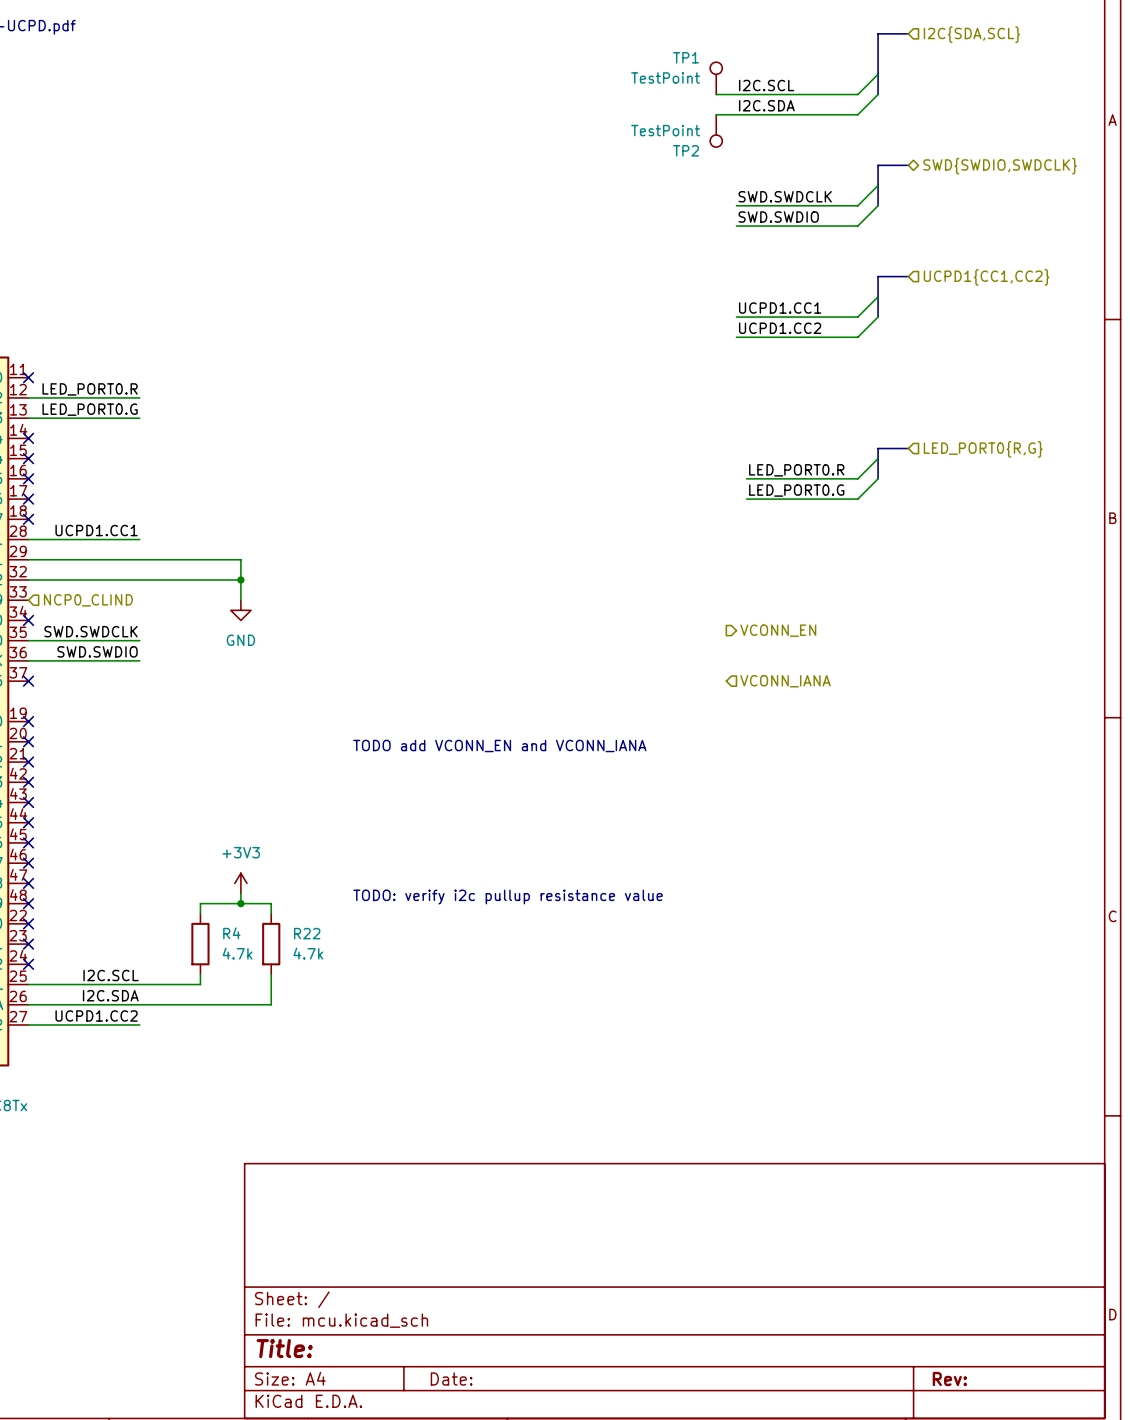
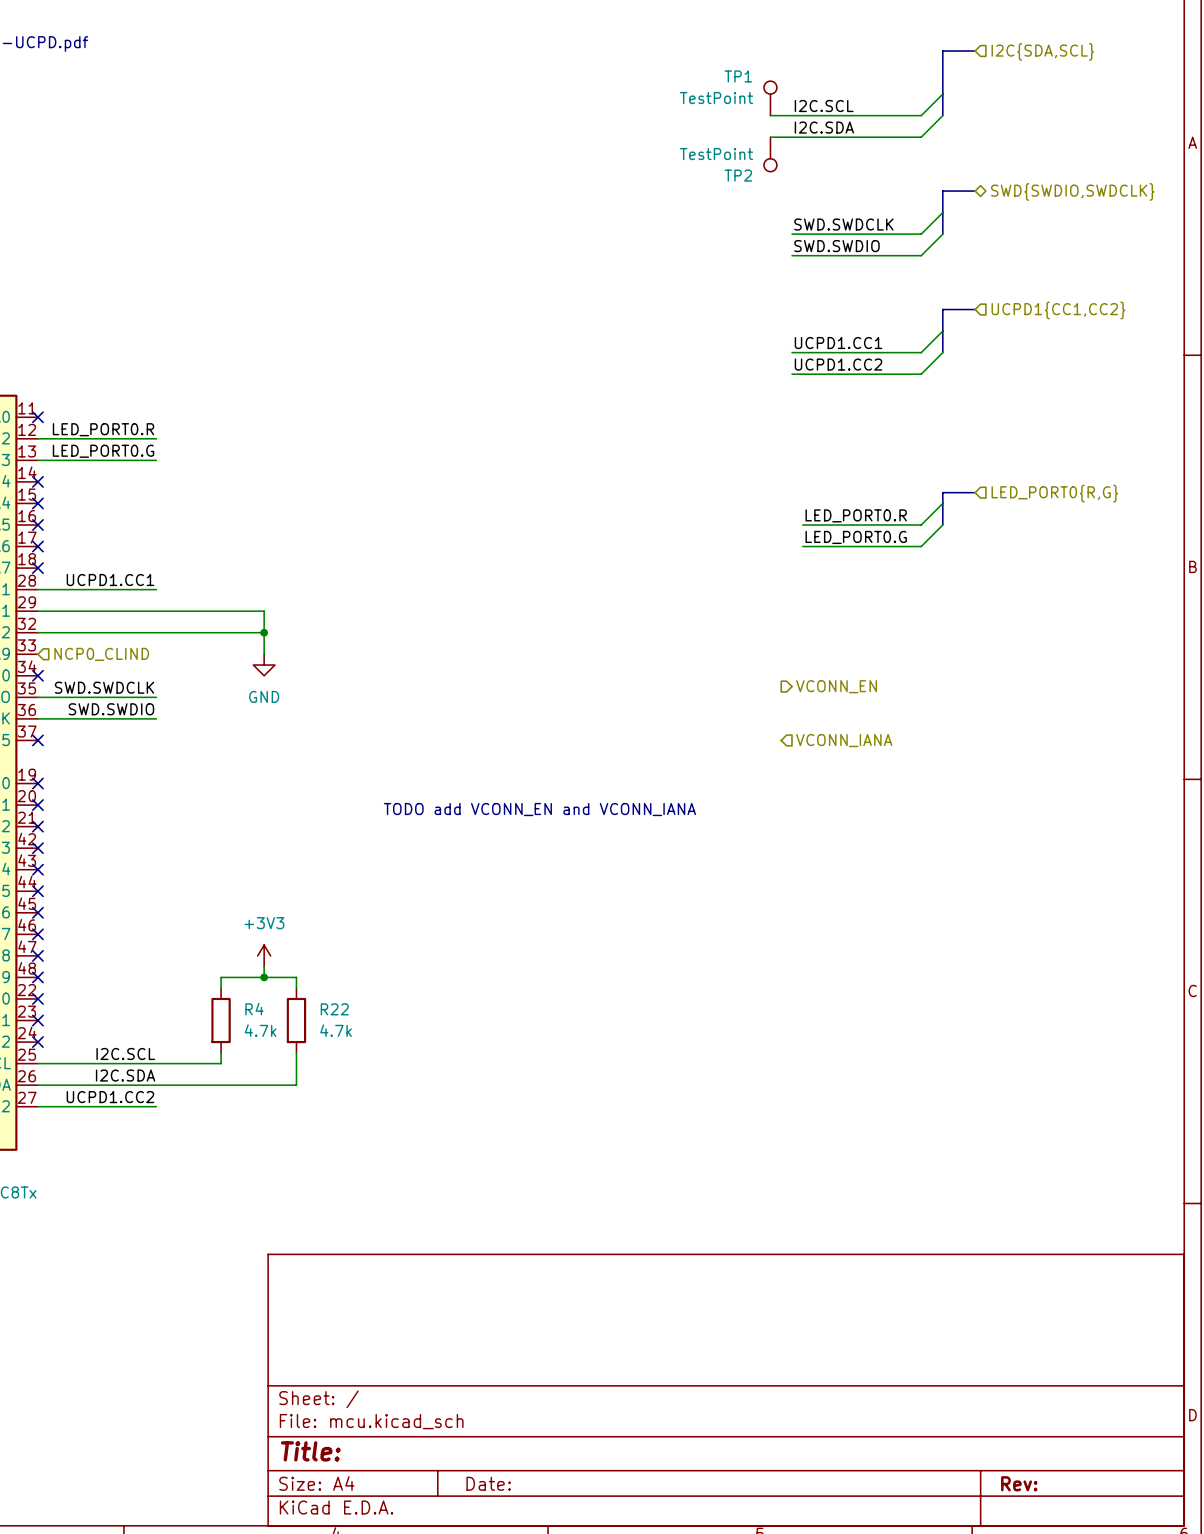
text: TODO: verify i2c pullup resistance value (508, 897) -> none

